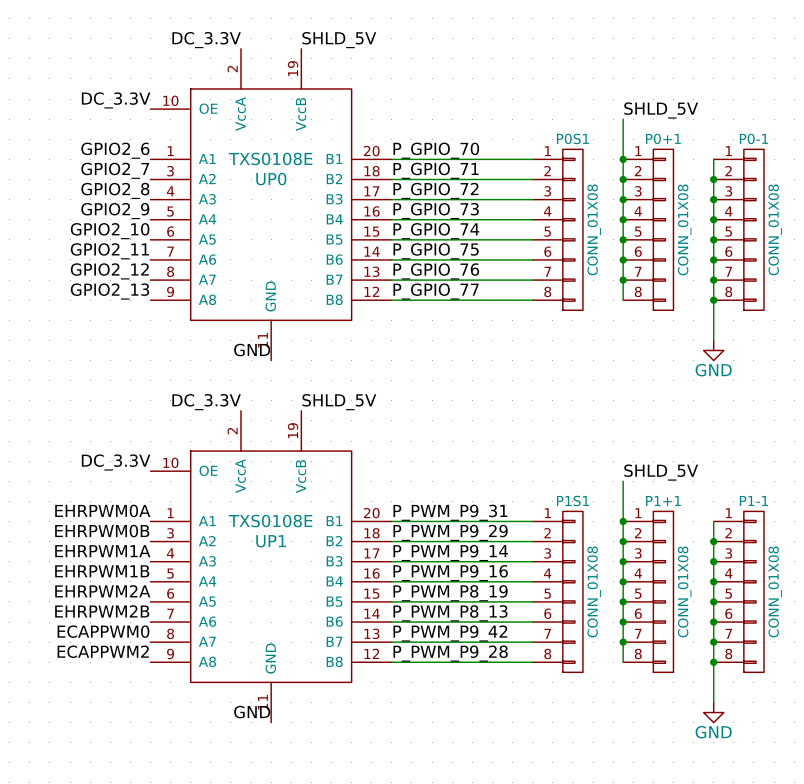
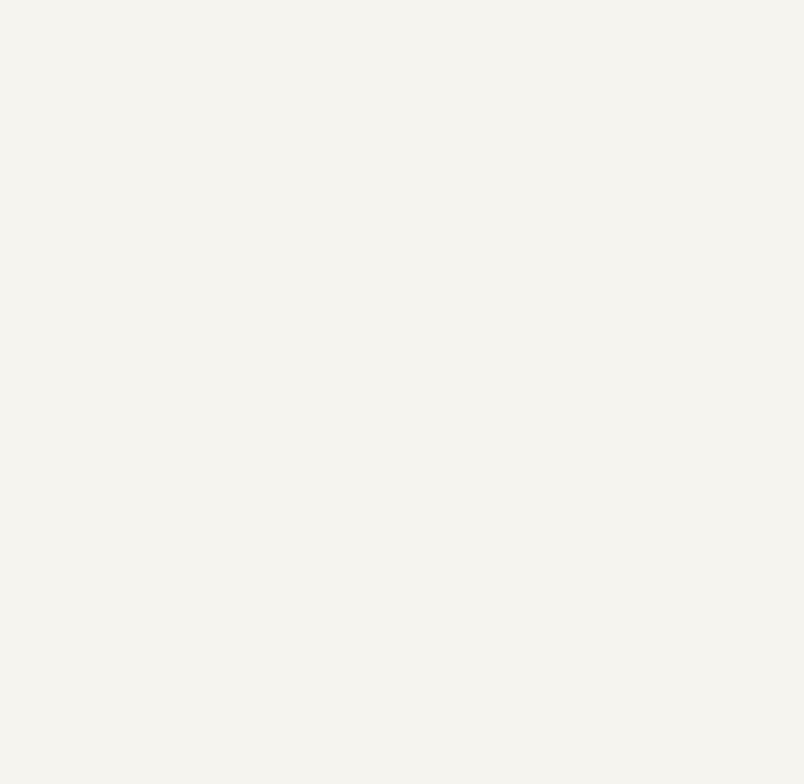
label: DC_3.3V (206, 40) -> none
label: SHLD_5V (339, 40) -> none
label: DC_3.3V (116, 100) -> none
label: SHLD_5V (661, 110) -> none
wire: (623, 119) (623, 300) -> none
label: GPIO2_6 (115, 150) -> none
label: P_GPIO_70 (436, 150) -> none
wire: (391, 159) (532, 159) -> none
junction: (623, 159) -> none
wire: (713, 159) (713, 340) -> none
label: GPIO2_7 (115, 170) -> none
label: P_GPIO_71 (436, 170) -> none
wire: (391, 179) (532, 179) -> none
junction: (623, 179) -> none
junction: (713, 179) -> none
label: GPIO2_8 (115, 190) -> none
label: P_GPIO_72 (436, 190) -> none
wire: (391, 199) (532, 199) -> none
junction: (623, 199) -> none
junction: (713, 199) -> none
UP0: TXS0108E (271, 204) -> none
label: GPIO2_9 (115, 211) -> none
label: P_GPIO_73 (436, 211) -> none
wire: (391, 219) (532, 219) -> none
junction: (623, 219) -> none
junction: (713, 219) -> none
P0S1: CONN_01X08 (557, 229) -> none
P0+1: CONN_01X08 (648, 229) -> none
P0-1: CONN_01X08 (738, 229) -> none
label: GPIO2_10 (110, 231) -> none
label: P_GPIO_74 (436, 231) -> none
wire: (391, 239) (532, 239) -> none
junction: (623, 239) -> none
junction: (713, 239) -> none
label: GPIO2_11 (109, 251) -> none
label: P_GPIO_75 (436, 251) -> none
wire: (391, 259) (532, 259) -> none
junction: (623, 259) -> none
junction: (713, 259) -> none
label: GPIO2_12 (109, 271) -> none
label: P_GPIO_76 (436, 271) -> none
wire: (391, 280) (532, 280) -> none
junction: (623, 280) -> none
junction: (713, 280) -> none
label: GPIO2_13 (109, 291) -> none
label: P_GPIO_77 (436, 291) -> none
wire: (391, 300) (532, 300) -> none
junction: (713, 300) -> none
label: GND (252, 350) -> none
power symbol: GND (713, 350) -> none
label: DC_3.3V (206, 402) -> none
label: SHLD_5V (339, 402) -> none
label: DC_3.3V (116, 462) -> none
label: SHLD_5V (661, 472) -> none
wire: (623, 481) (623, 662) -> none
label: EHRPWM0A (102, 510) -> none
label: P_PWM_P9_31 (450, 512) -> none
wire: (391, 521) (532, 521) -> none
junction: (623, 521) -> none
wire: (713, 521) (713, 702) -> none
label: EHRPWM0B (102, 531) -> none
label: P_PWM_P9_29 (450, 532) -> none
wire: (391, 541) (532, 541) -> none
junction: (623, 541) -> none
junction: (713, 541) -> none
label: EHRPWM1A (102, 551) -> none
label: P_PWM_P9_14 (450, 553) -> none
wire: (391, 561) (532, 561) -> none
junction: (623, 561) -> none
junction: (713, 561) -> none
UP1: TXS0108E (271, 566) -> none
label: EHRPWM1B (102, 571) -> none
label: P_PWM_P9_16 (450, 573) -> none
wire: (391, 581) (532, 581) -> none
junction: (623, 581) -> none
junction: (713, 581) -> none
label: EHRPWM2A (102, 591) -> none
P1S1: CONN_01X08 (557, 591) -> none
P1+1: CONN_01X08 (648, 591) -> none
P1-1: CONN_01X08 (738, 591) -> none
label: P_PWM_P8_19 (450, 593) -> none
wire: (391, 601) (532, 601) -> none
junction: (623, 601) -> none
junction: (713, 601) -> none
label: EHRPWM2B (102, 611) -> none
label: P_PWM_P8_13 (450, 613) -> none
wire: (391, 622) (532, 622) -> none
junction: (623, 622) -> none
junction: (713, 622) -> none
label: ECAPPWM0 (103, 631) -> none
label: P_PWM_P9_42 (450, 633) -> none
wire: (391, 642) (532, 642) -> none
junction: (623, 642) -> none
junction: (713, 642) -> none
label: ECAPPWM2 (103, 651) -> none
label: P_PWM_P9_28 (450, 653) -> none
wire: (391, 662) (532, 662) -> none
junction: (713, 662) -> none
label: GND (252, 712) -> none
power symbol: GND (713, 712) -> none

